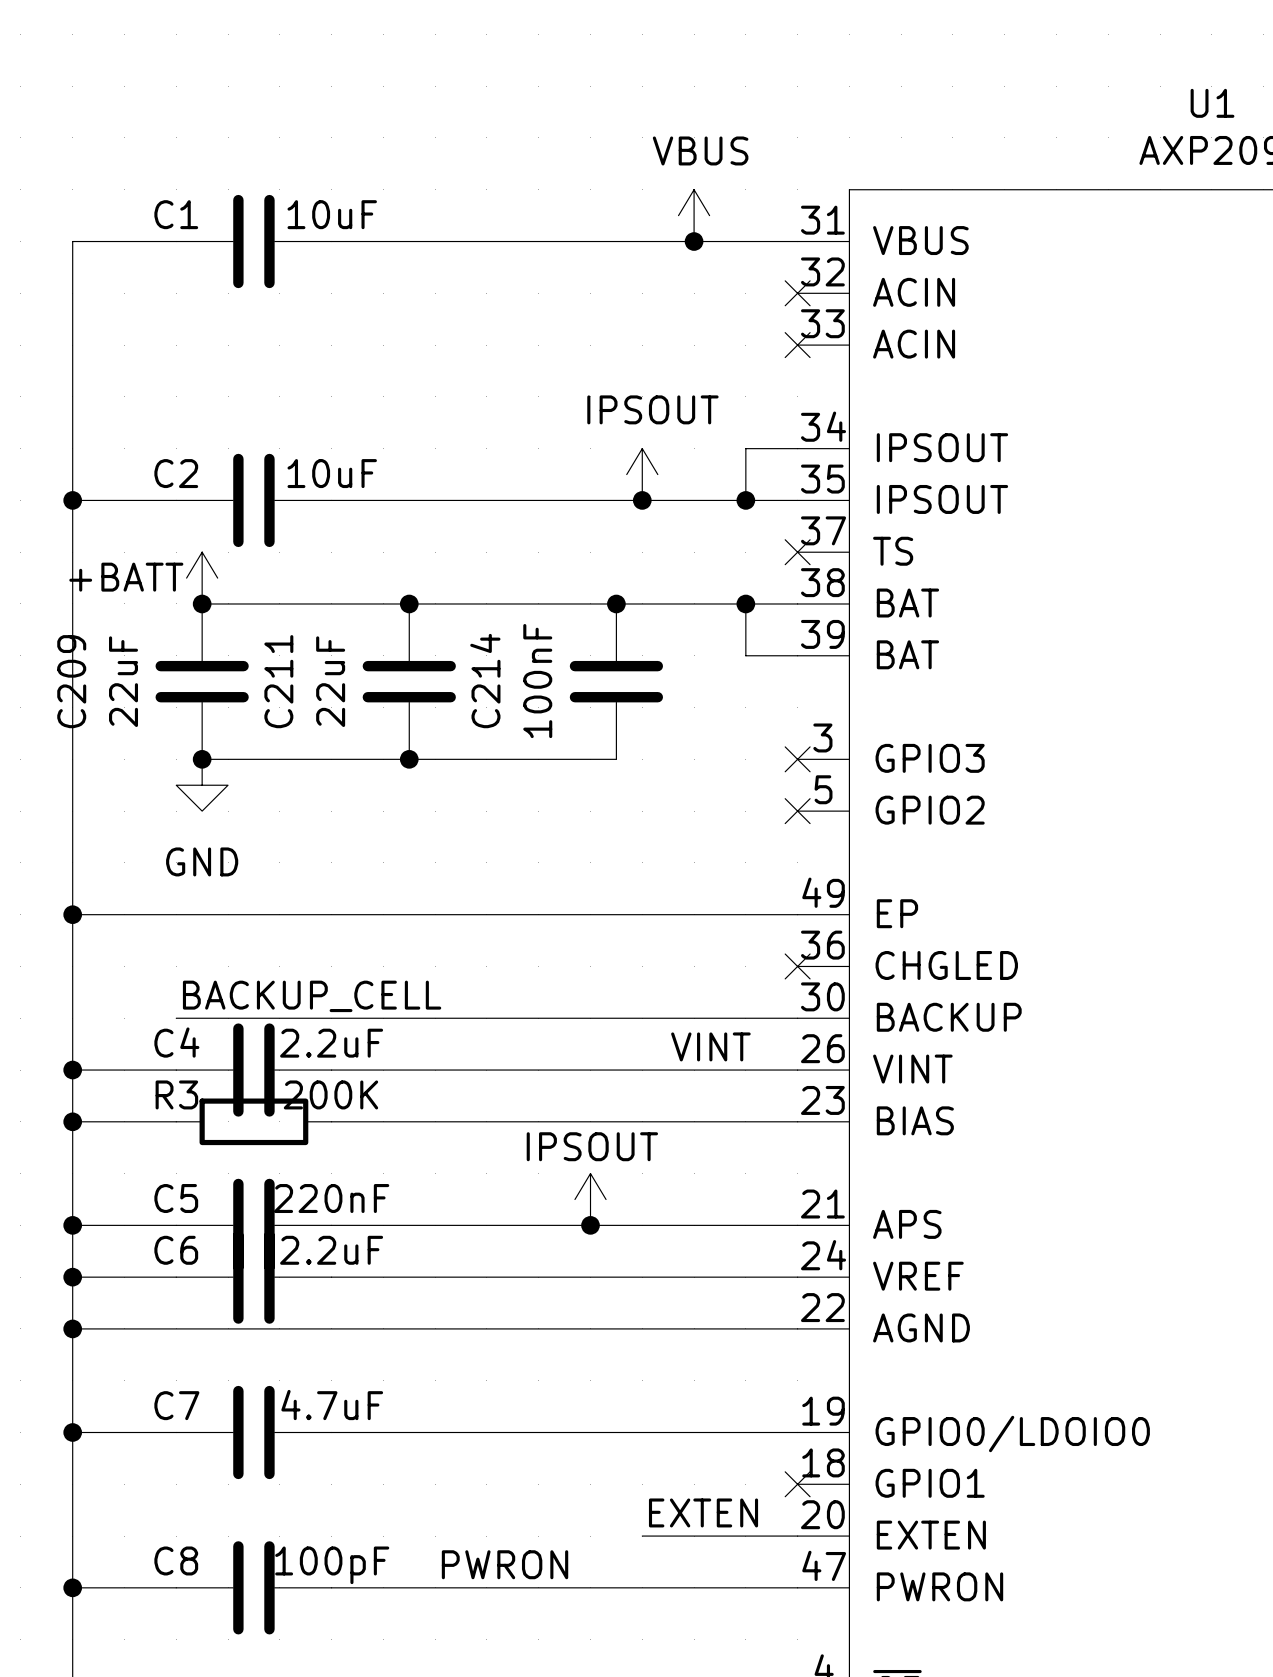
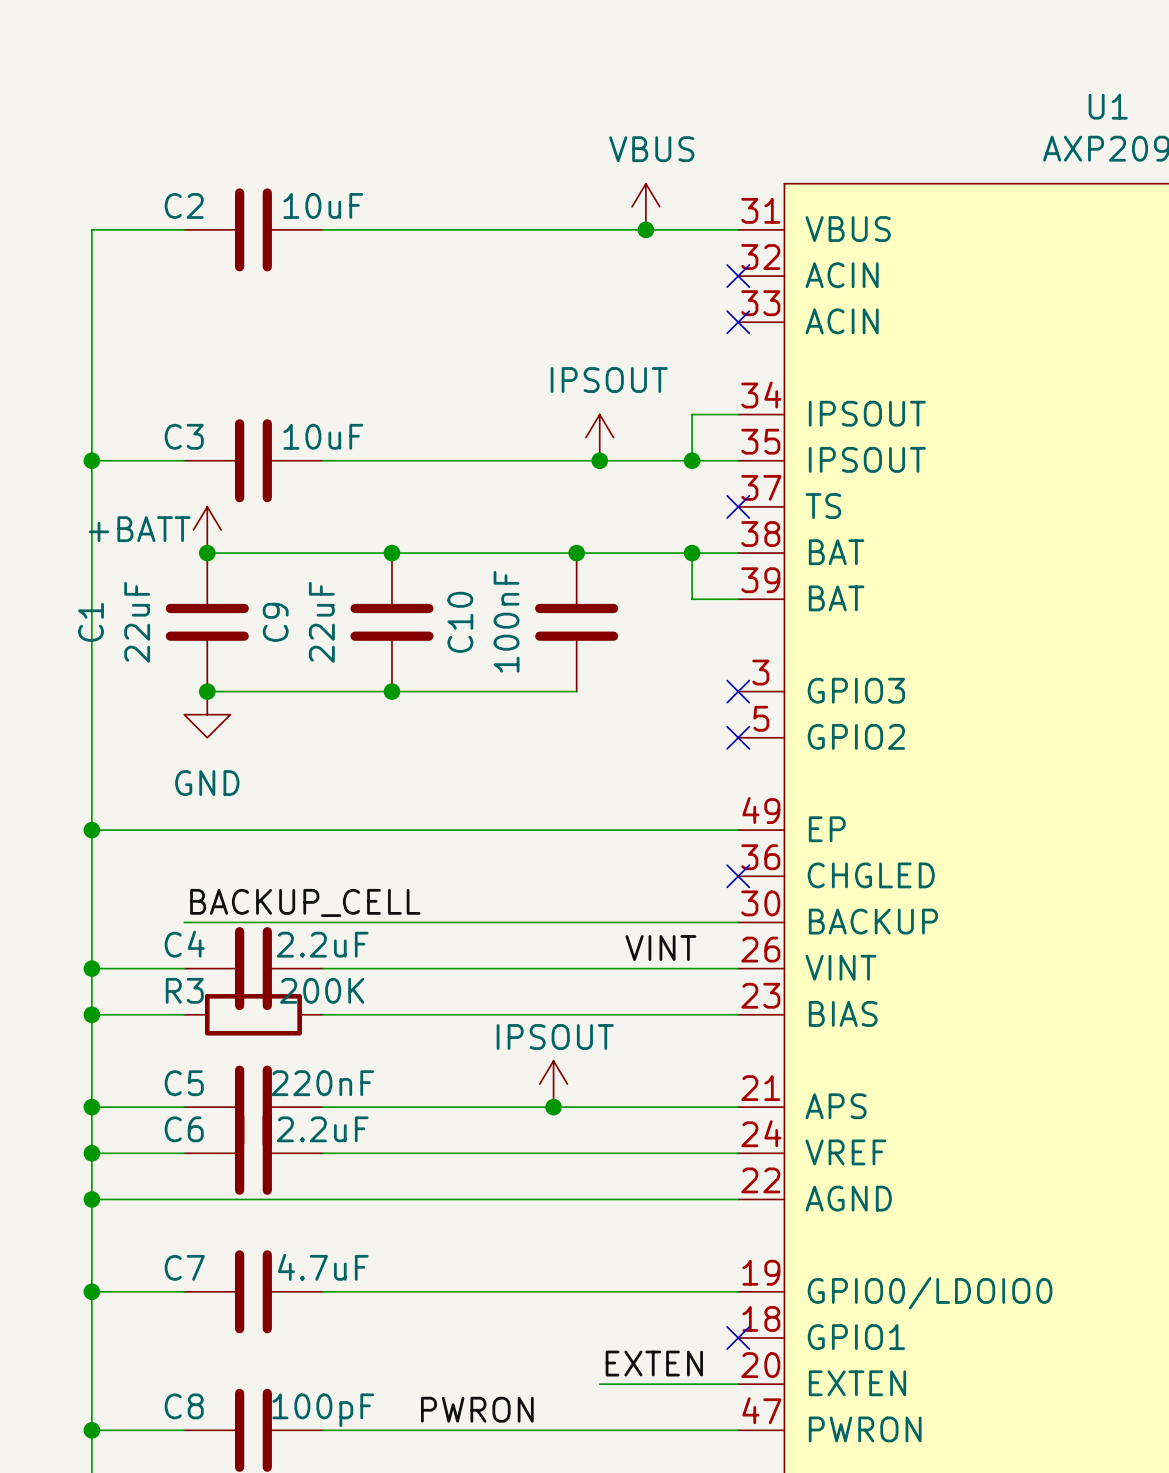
C1 name: C1 (176, 214) -> C2 (184, 205)
C2 name: C2 (176, 473) -> C3 (184, 436)
C209 name: C209 (71, 681) -> C1 (91, 622)
C211 name: C211 (278, 681) -> C9 (275, 622)
C214 name: C214 (485, 681) -> C10 (460, 622)

